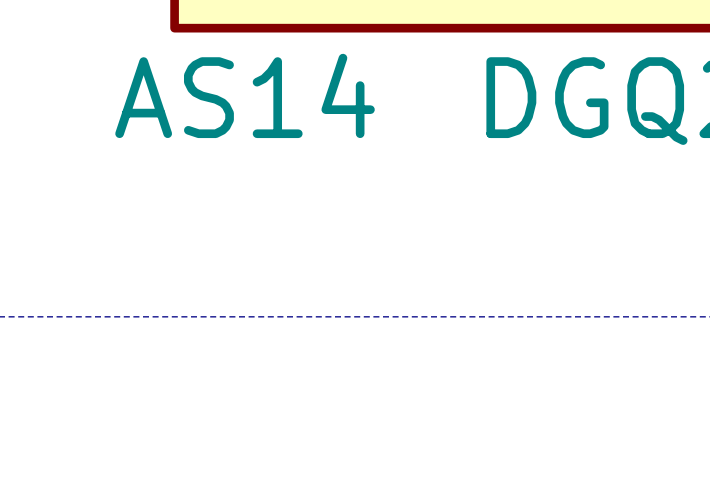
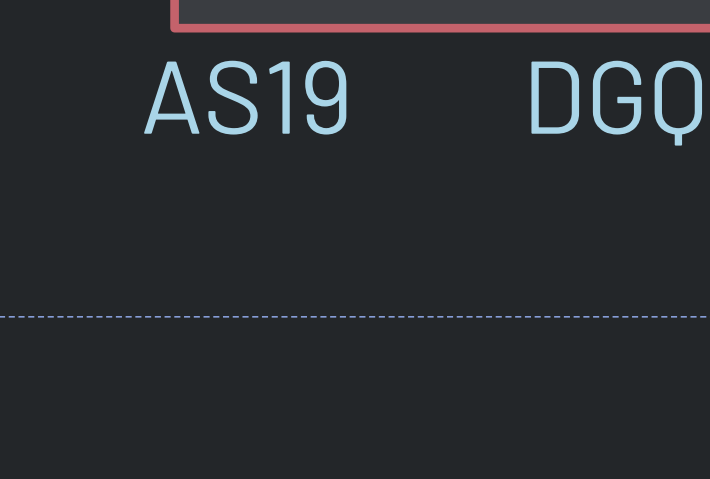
AS14 name: AS14 (245, 95) -> AS19 (245, 97)

